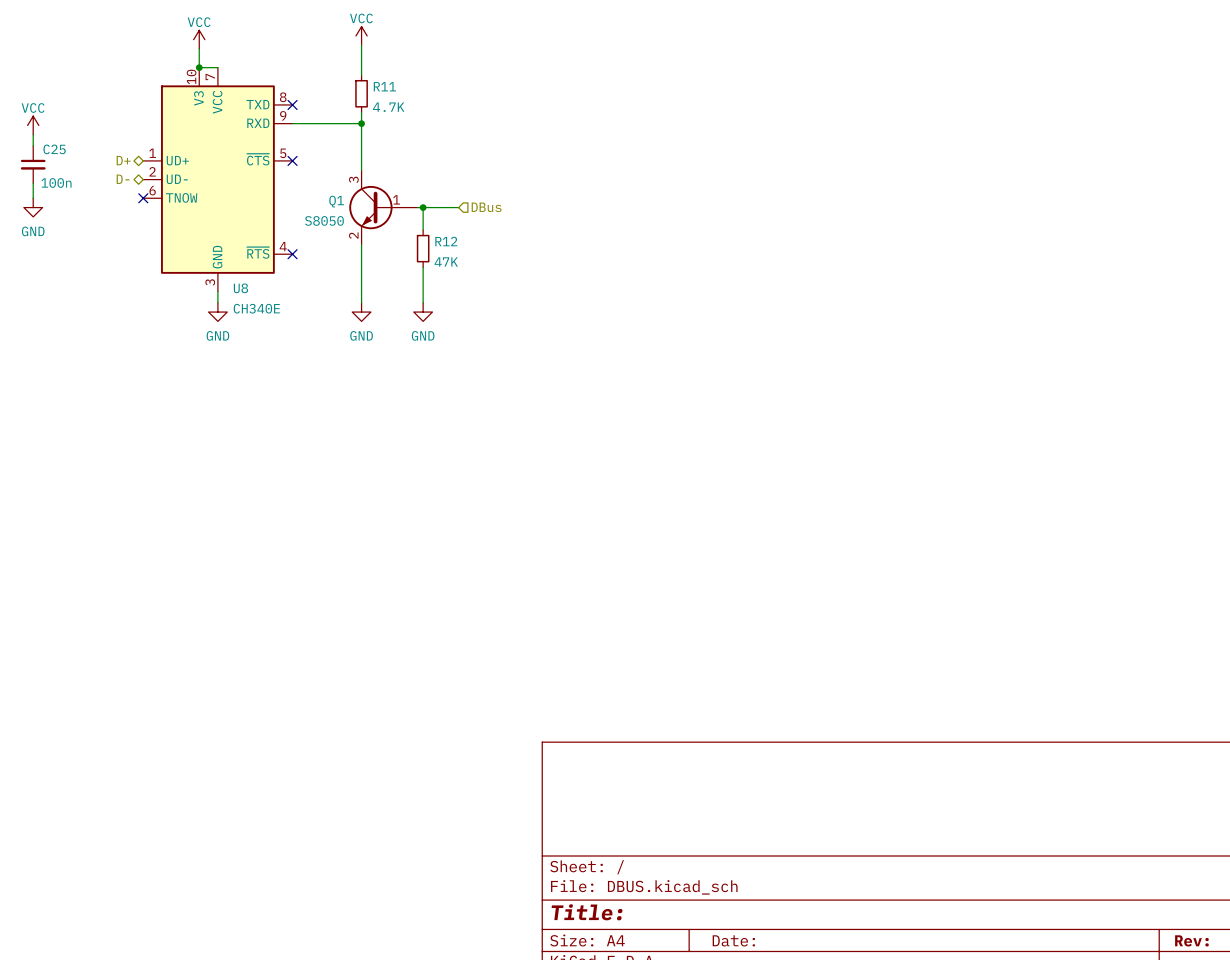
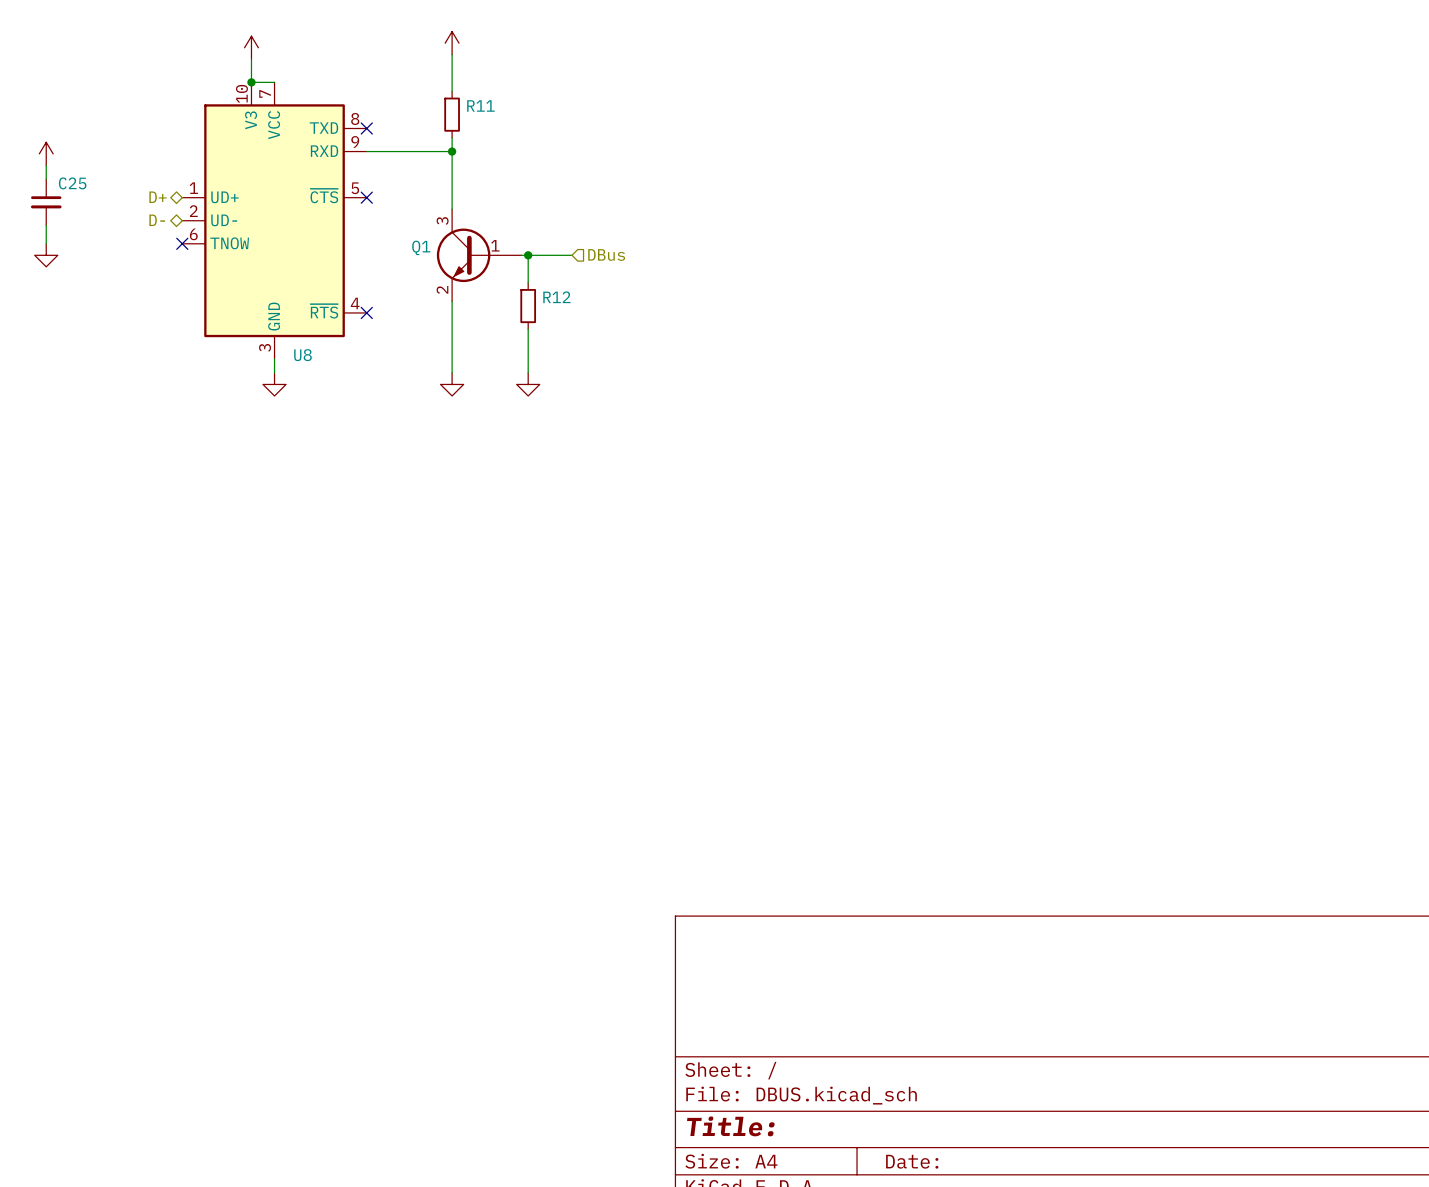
power symbol text: VCC (361, 18) -> none
power symbol text: VCC (199, 22) -> none
R11 value: 4.7K (388, 107) -> none
power symbol text: VCC (33, 108) -> none
C25 value: 100n (56, 182) -> none
Q1 value: S8050 (324, 220) -> none
power symbol text: GND (33, 231) -> none
R12 value: 47K (446, 261) -> none
U8 value: CH340E (256, 308) -> none
power symbol text: GND (217, 335) -> none
power symbol text: GND (361, 335) -> none
power symbol text: GND (423, 335) -> none

